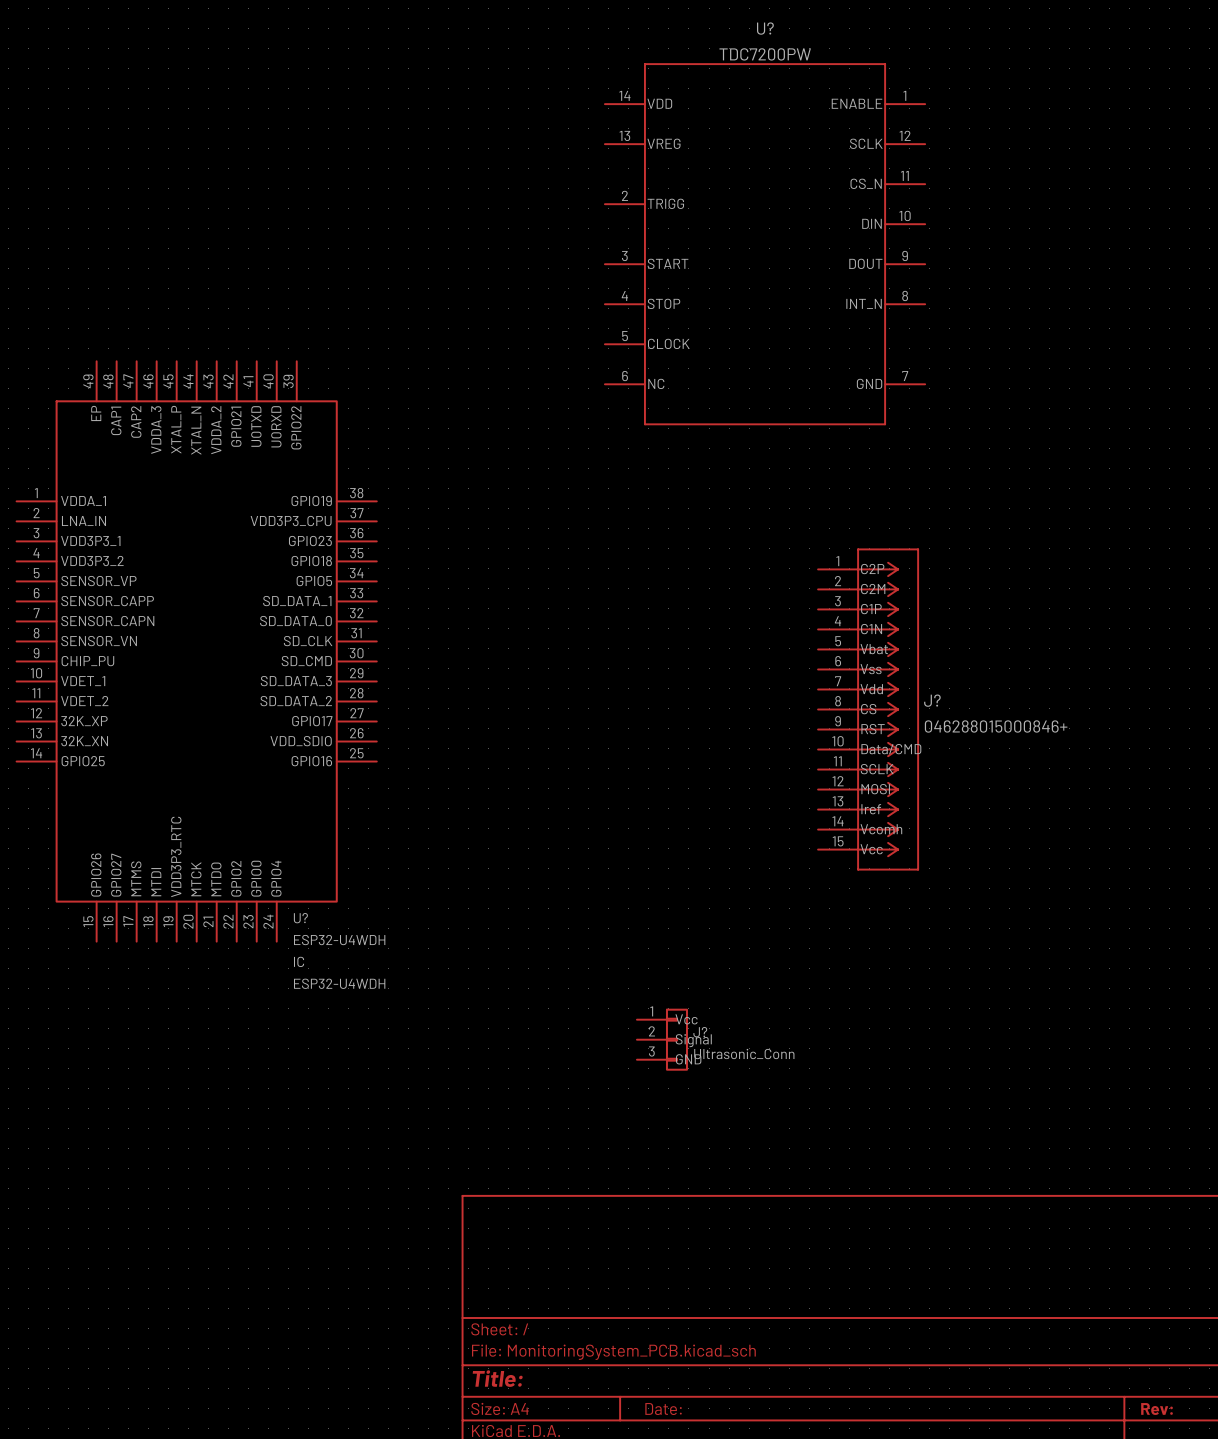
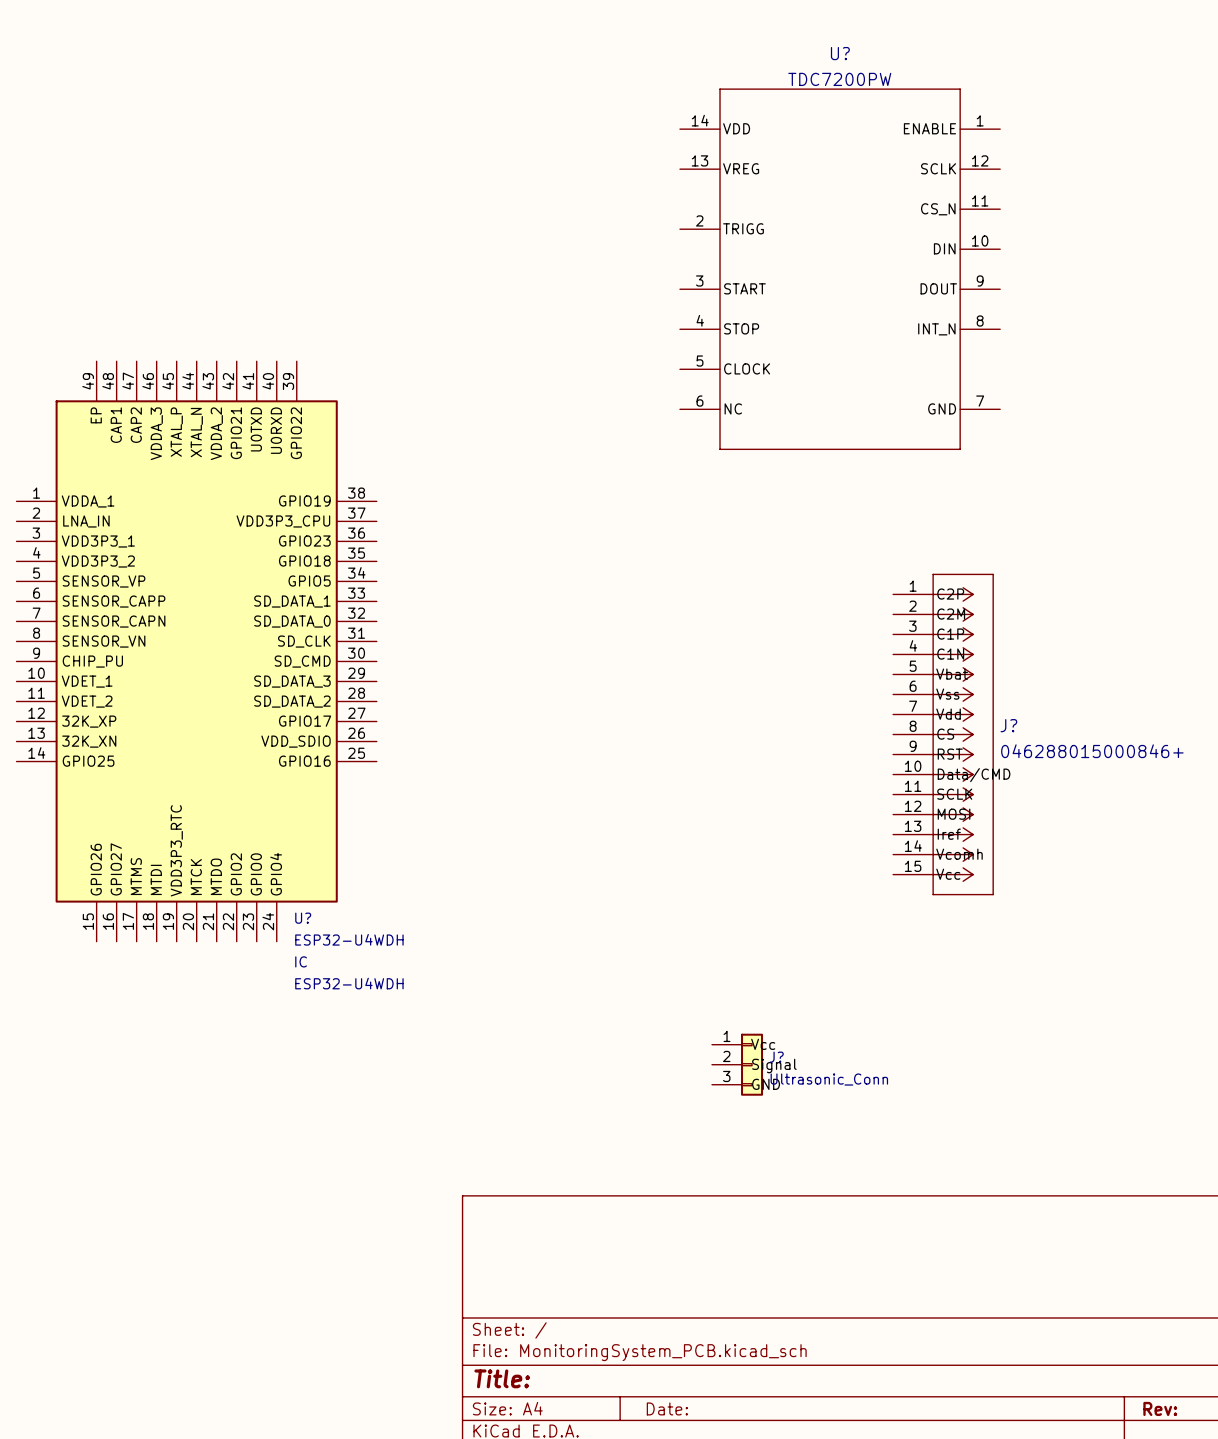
U? position: (765, 244) -> (840, 269)
J? position: (868, 709) -> (943, 734)
J? position: (662, 1039) -> (737, 1064)

